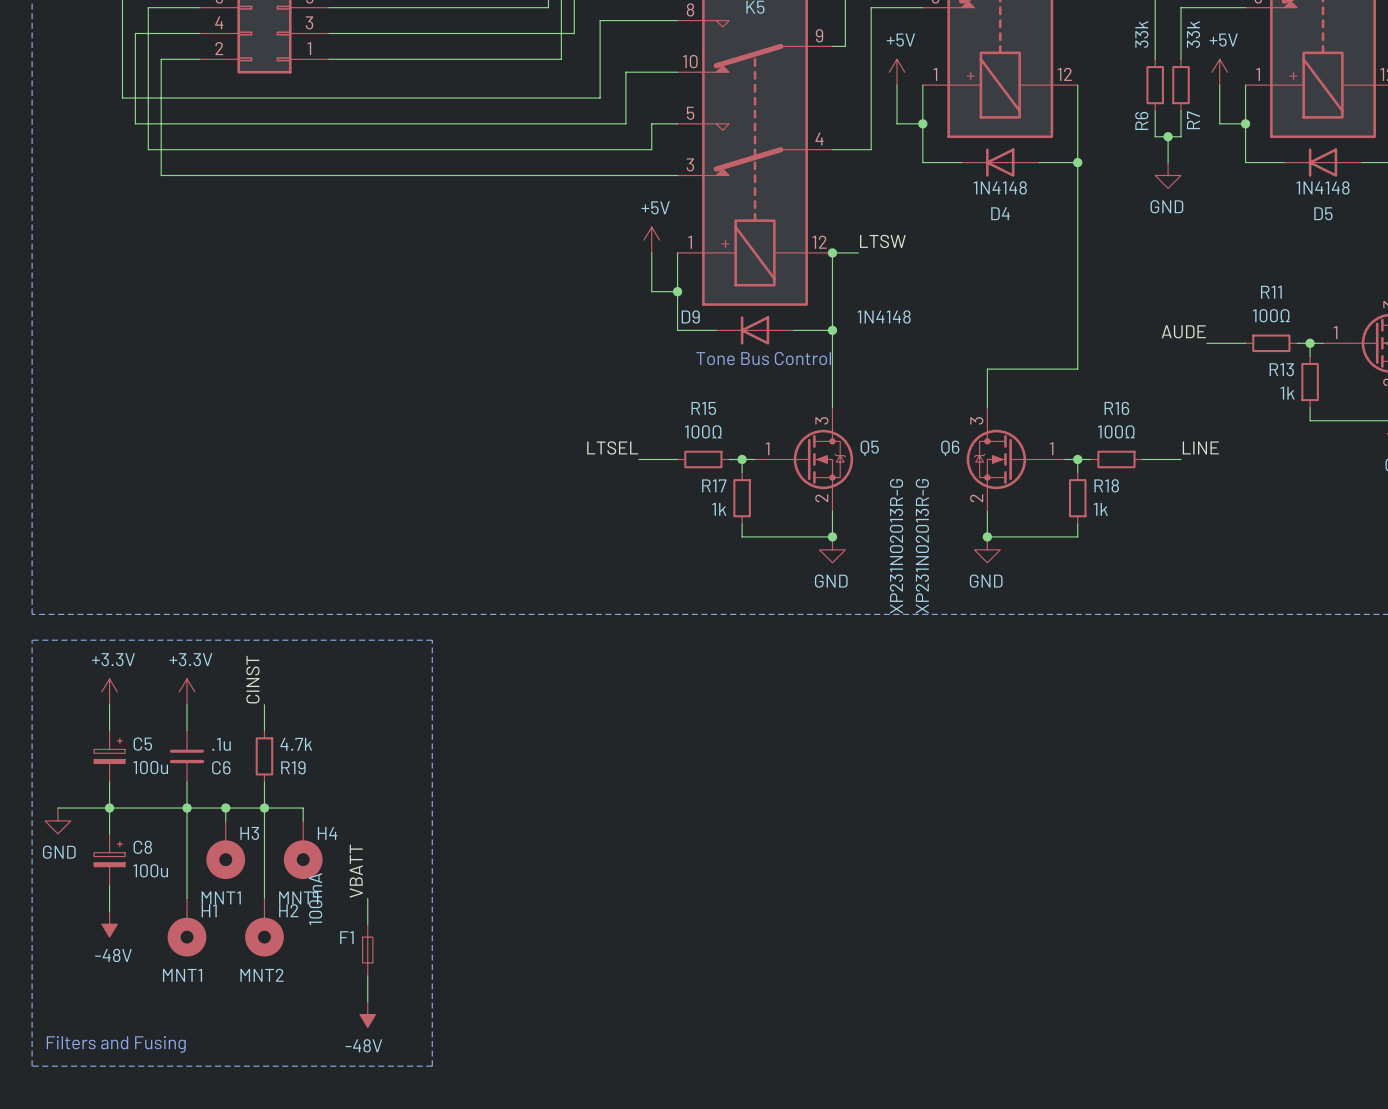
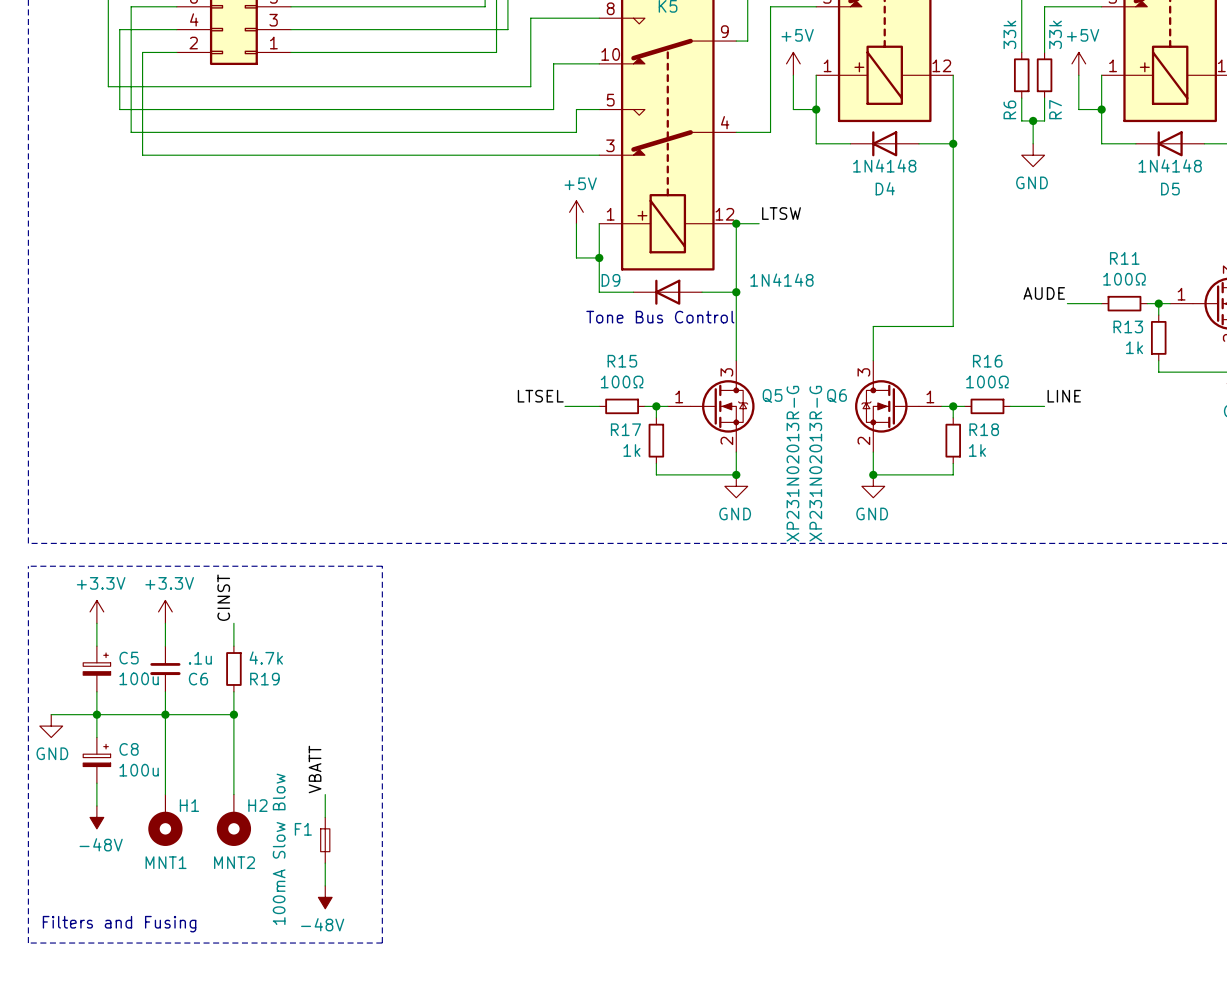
wire: (225, 808) (225, 820) -> none
junction: (225, 808) -> none
wire: (264, 808) (303, 808) (303, 820) -> none
H3: MNT1 (225, 849) -> none
H4: MNT1 (303, 849) -> none
F1 value: 100mA (315, 899) -> 100mA Slow Blow (279, 849)

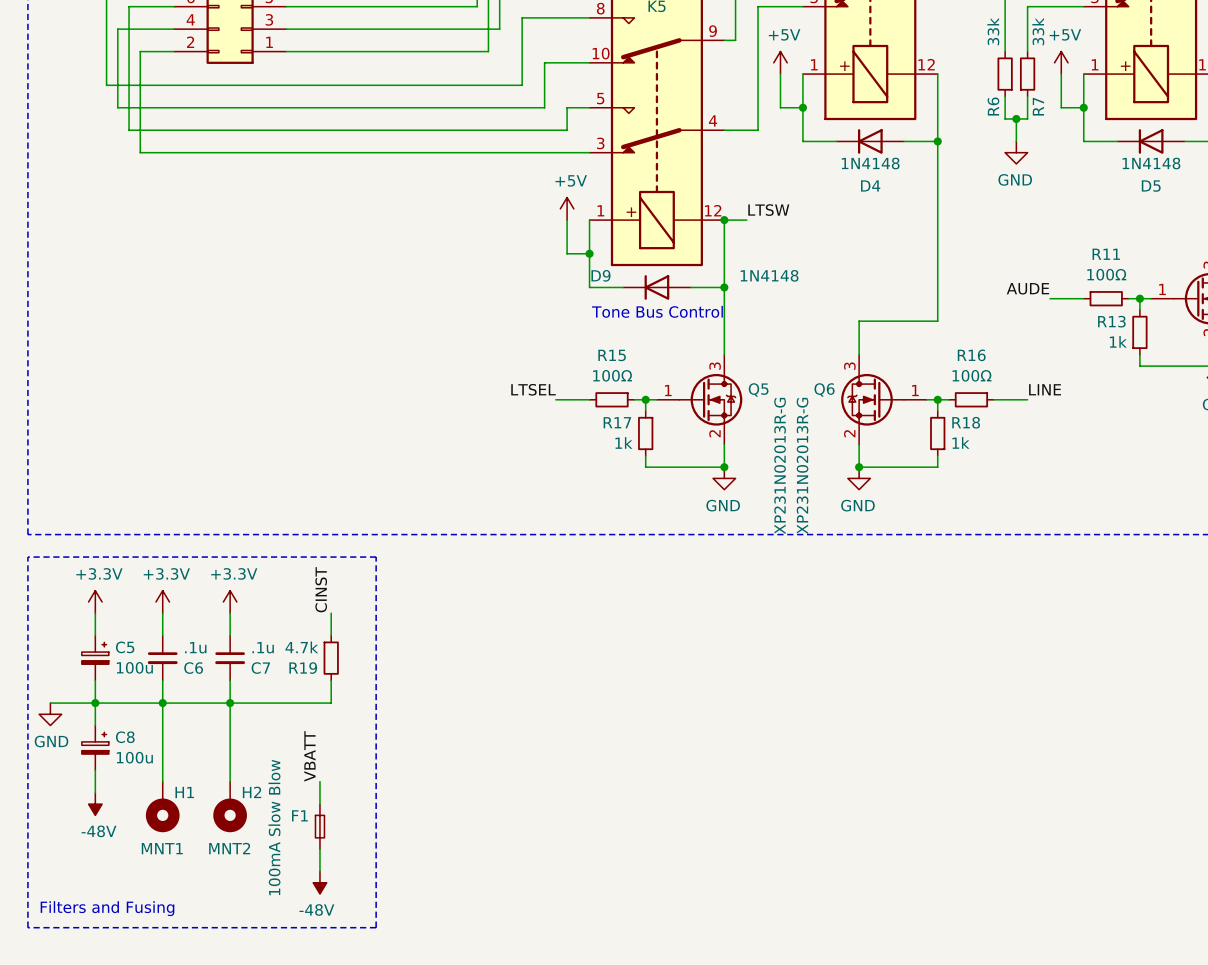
label position: CINST (223, 597) -> CINST (321, 589)
power symbol: none -> +3.3V (230, 601)
wire: none -> (331, 613) (331, 635)
R19 value position: 4.7k (266, 658) -> 4.7k (301, 647)
R19 position: (233, 669) -> (331, 658)
C7: none -> .1u (230, 658)
R19 name position: R19 (264, 679) -> R19 (303, 668)
wire: none -> (331, 680) (331, 703) (230, 703)

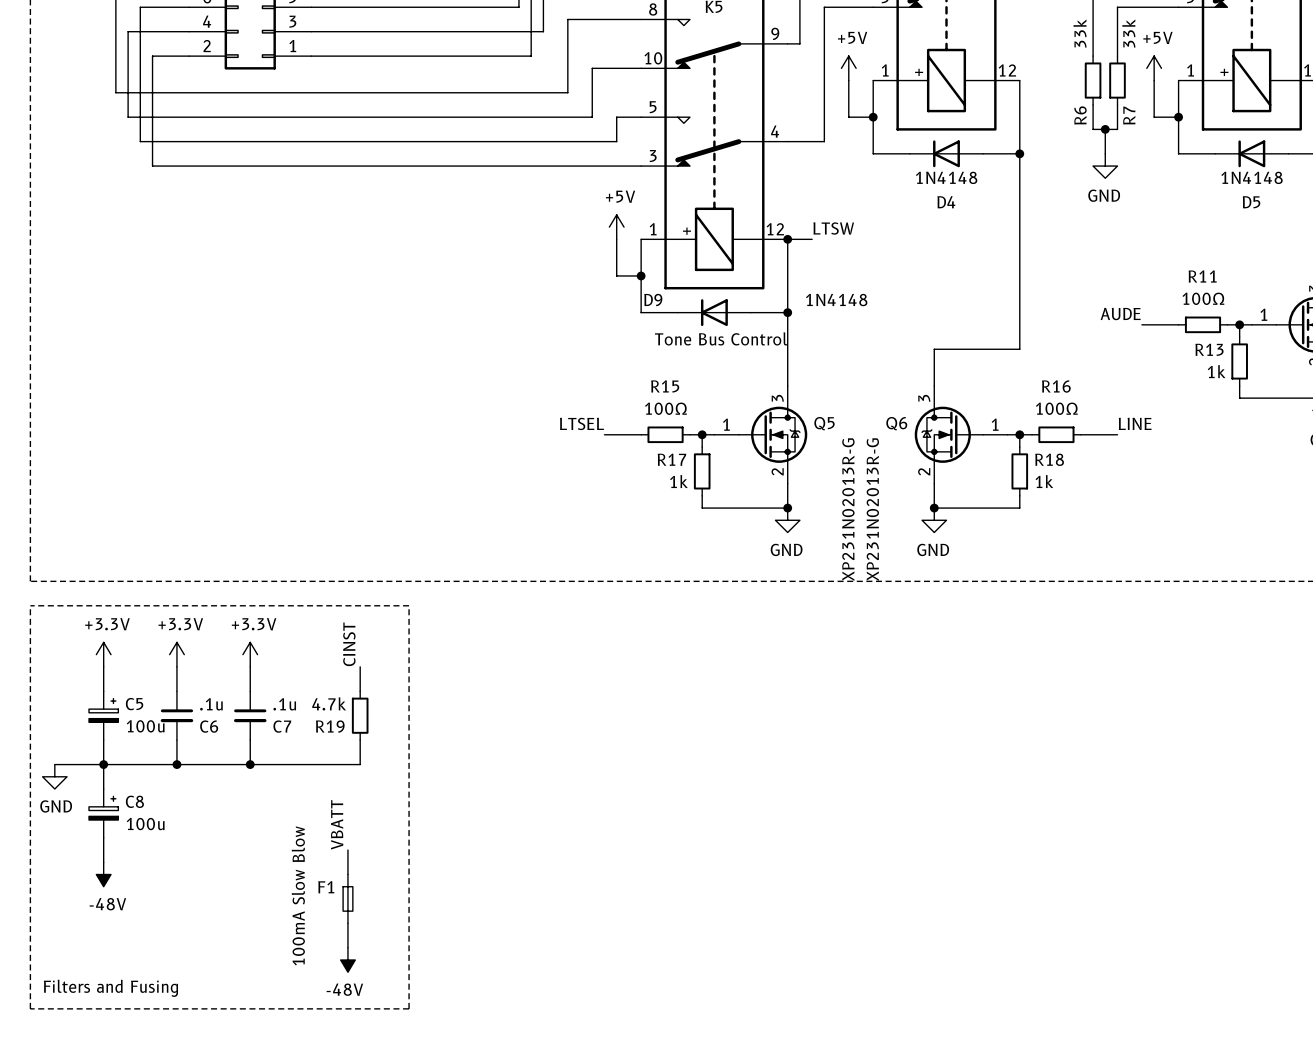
wire: (162, 703) (162, 781) -> none
wire: (230, 703) (230, 781) -> none
H1: MNT1 (162, 806) -> none
H2: MNT2 (230, 806) -> none

